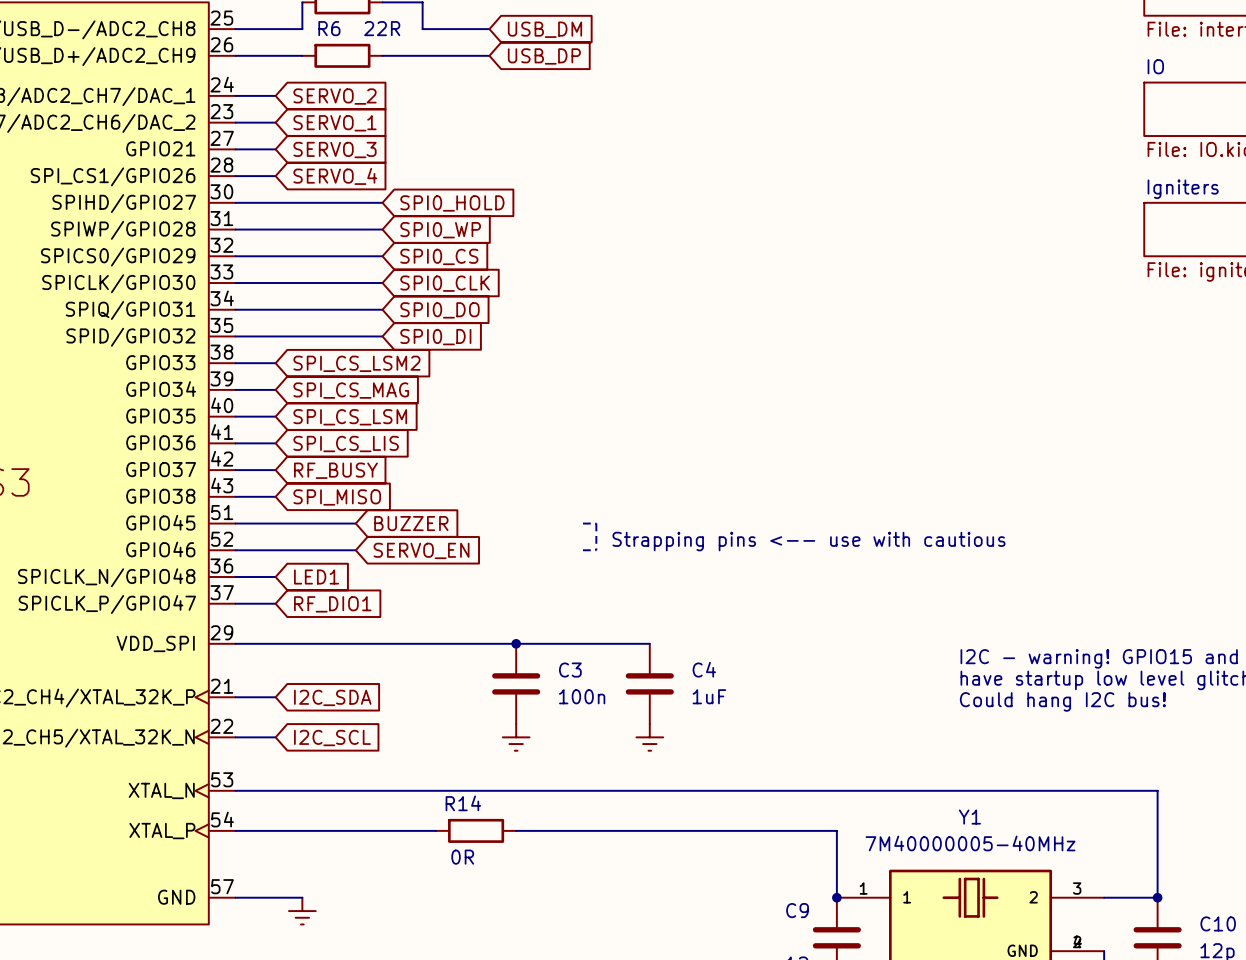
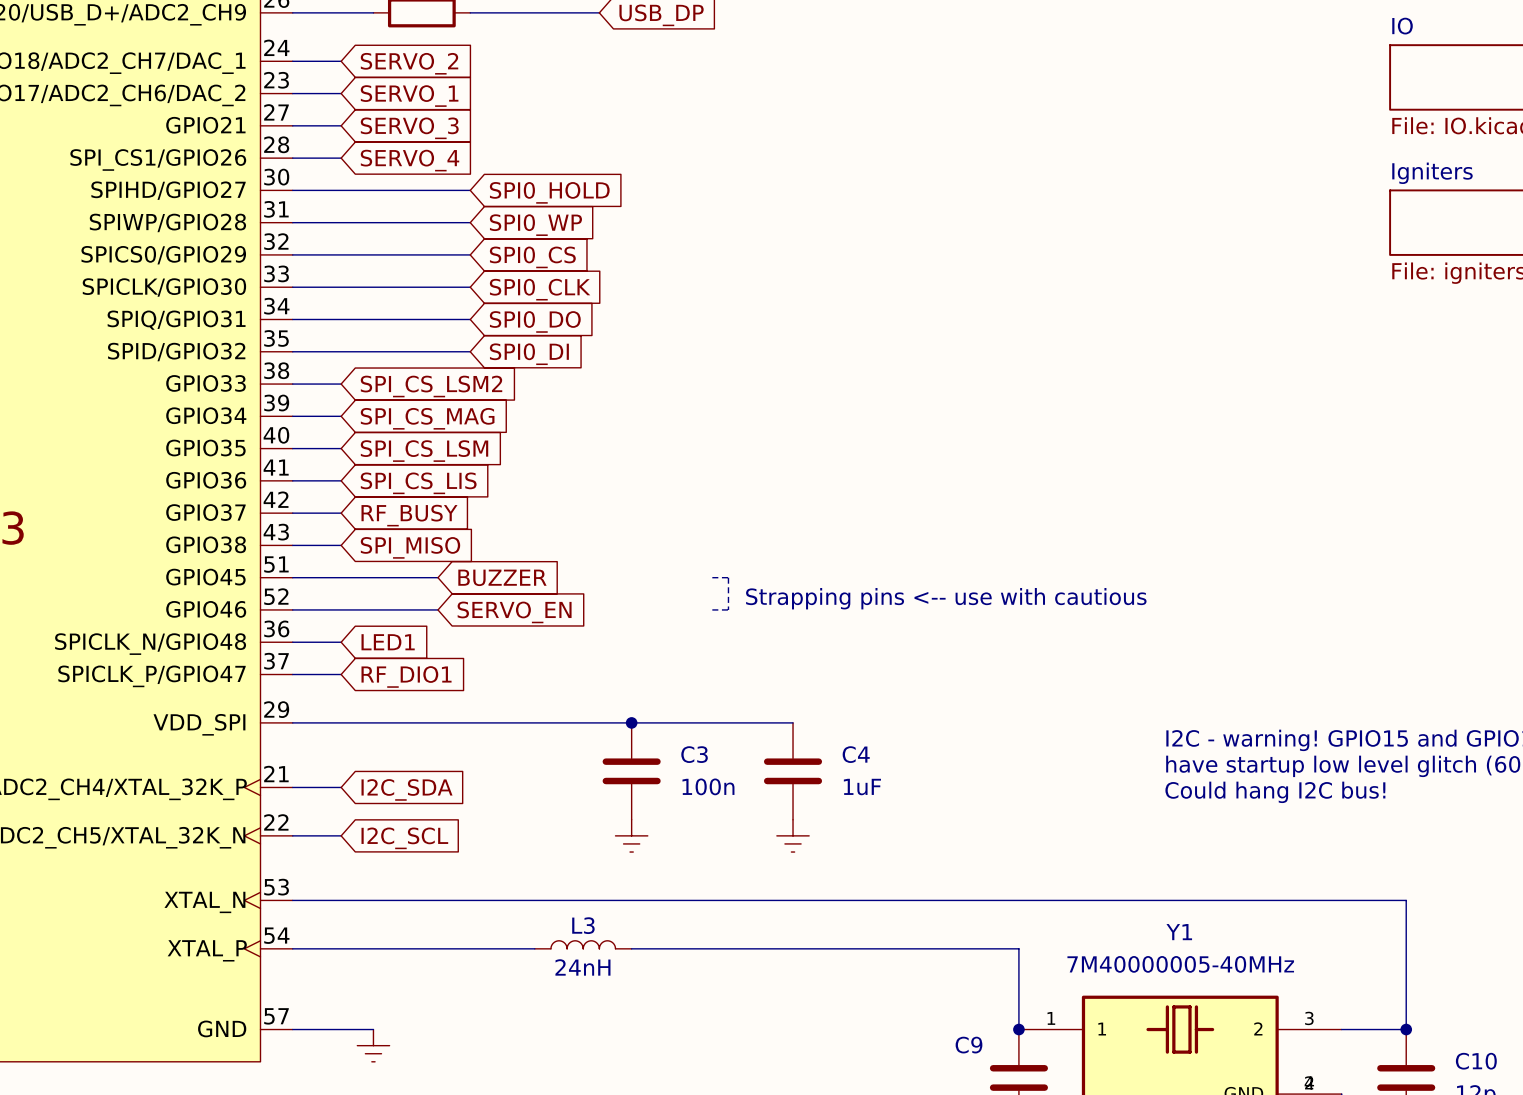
L3: none -> 24nH (583, 944)
R14: 0R (476, 830) -> none

